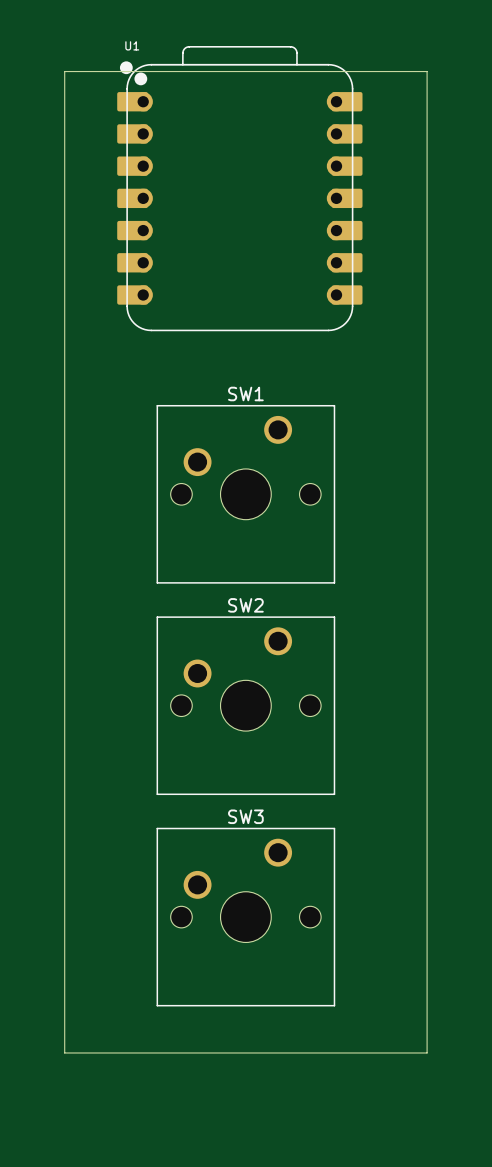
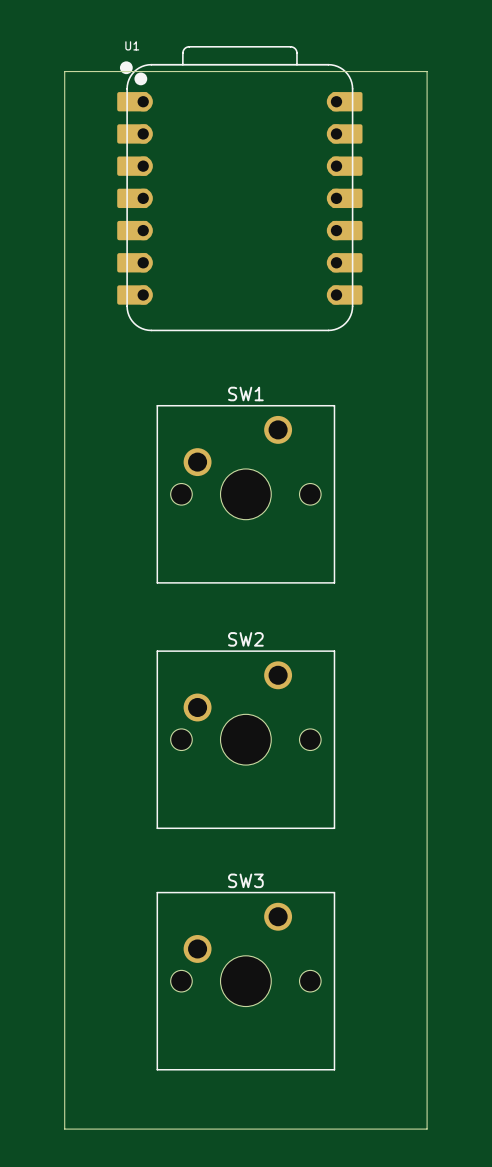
SW2 position: (245, 705) -> (245, 739)
SW3 position: (245, 917) -> (245, 981)
board edge: (64, 1052) (427, 1052) -> (64, 1052) (64, 1129) (427, 1129) (427, 1052)

